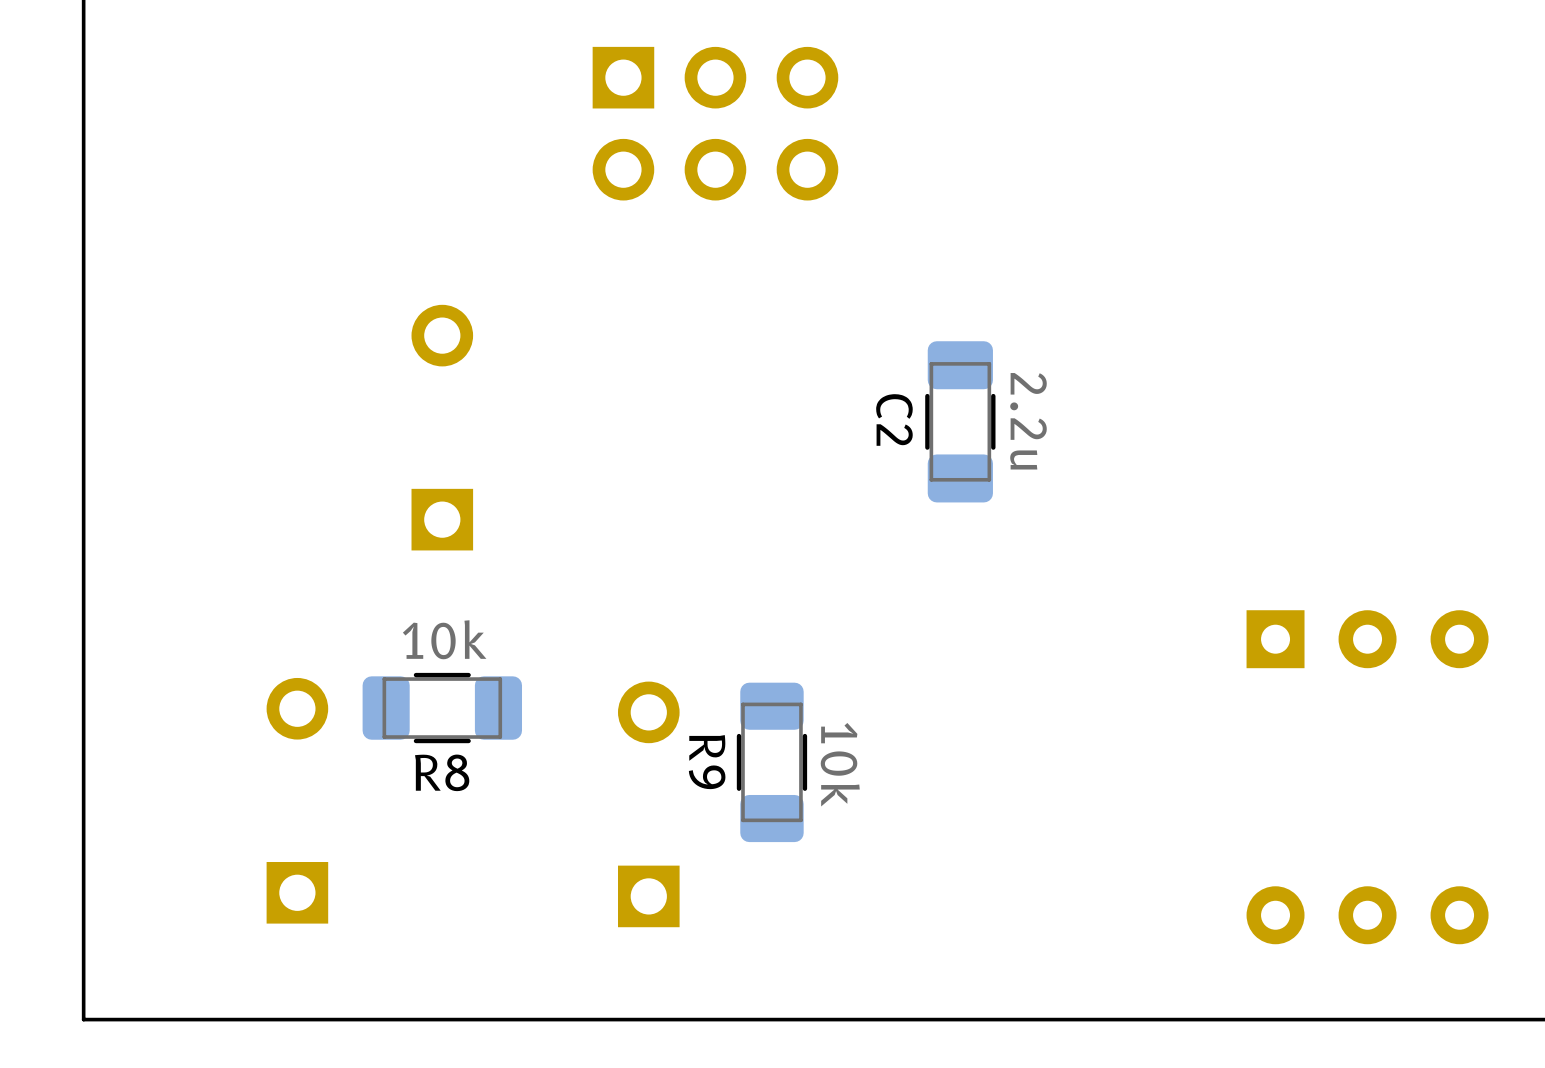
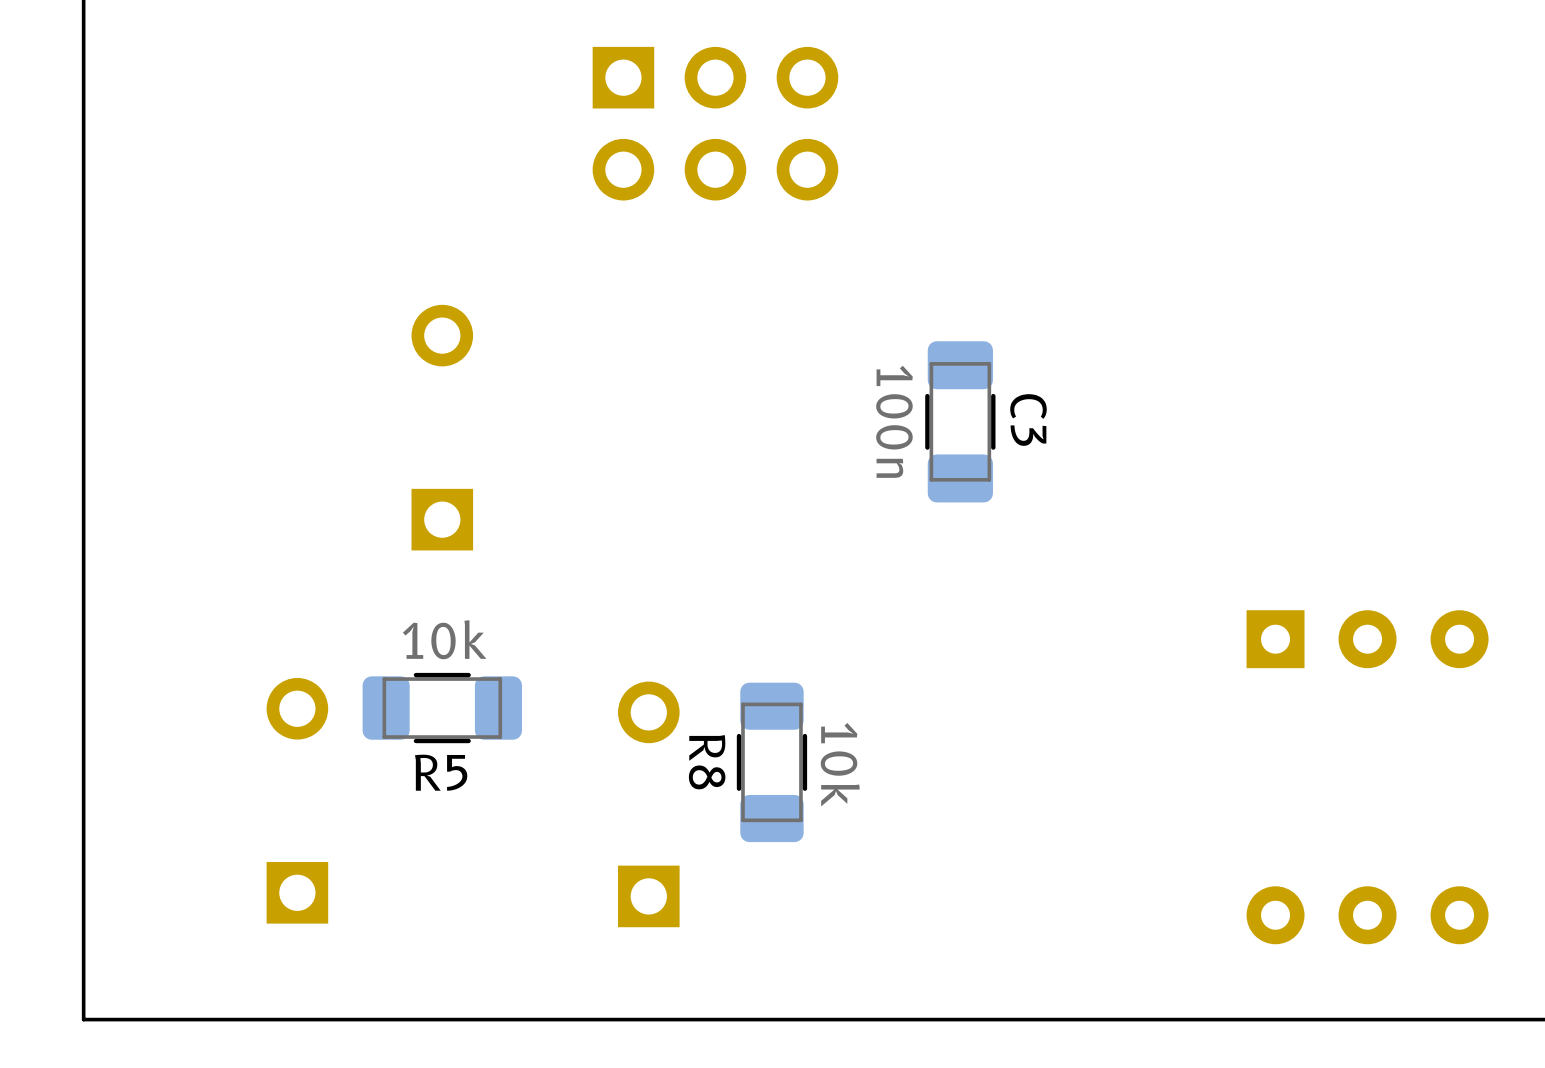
C2 name: C2 (894, 419) -> C3 (1028, 420)
C2 value: 2.2u (1028, 421) -> 100n (894, 421)
R9 name: R9 (707, 762) -> R8 (707, 762)
R8 name: R8 (442, 772) -> R5 (441, 772)

